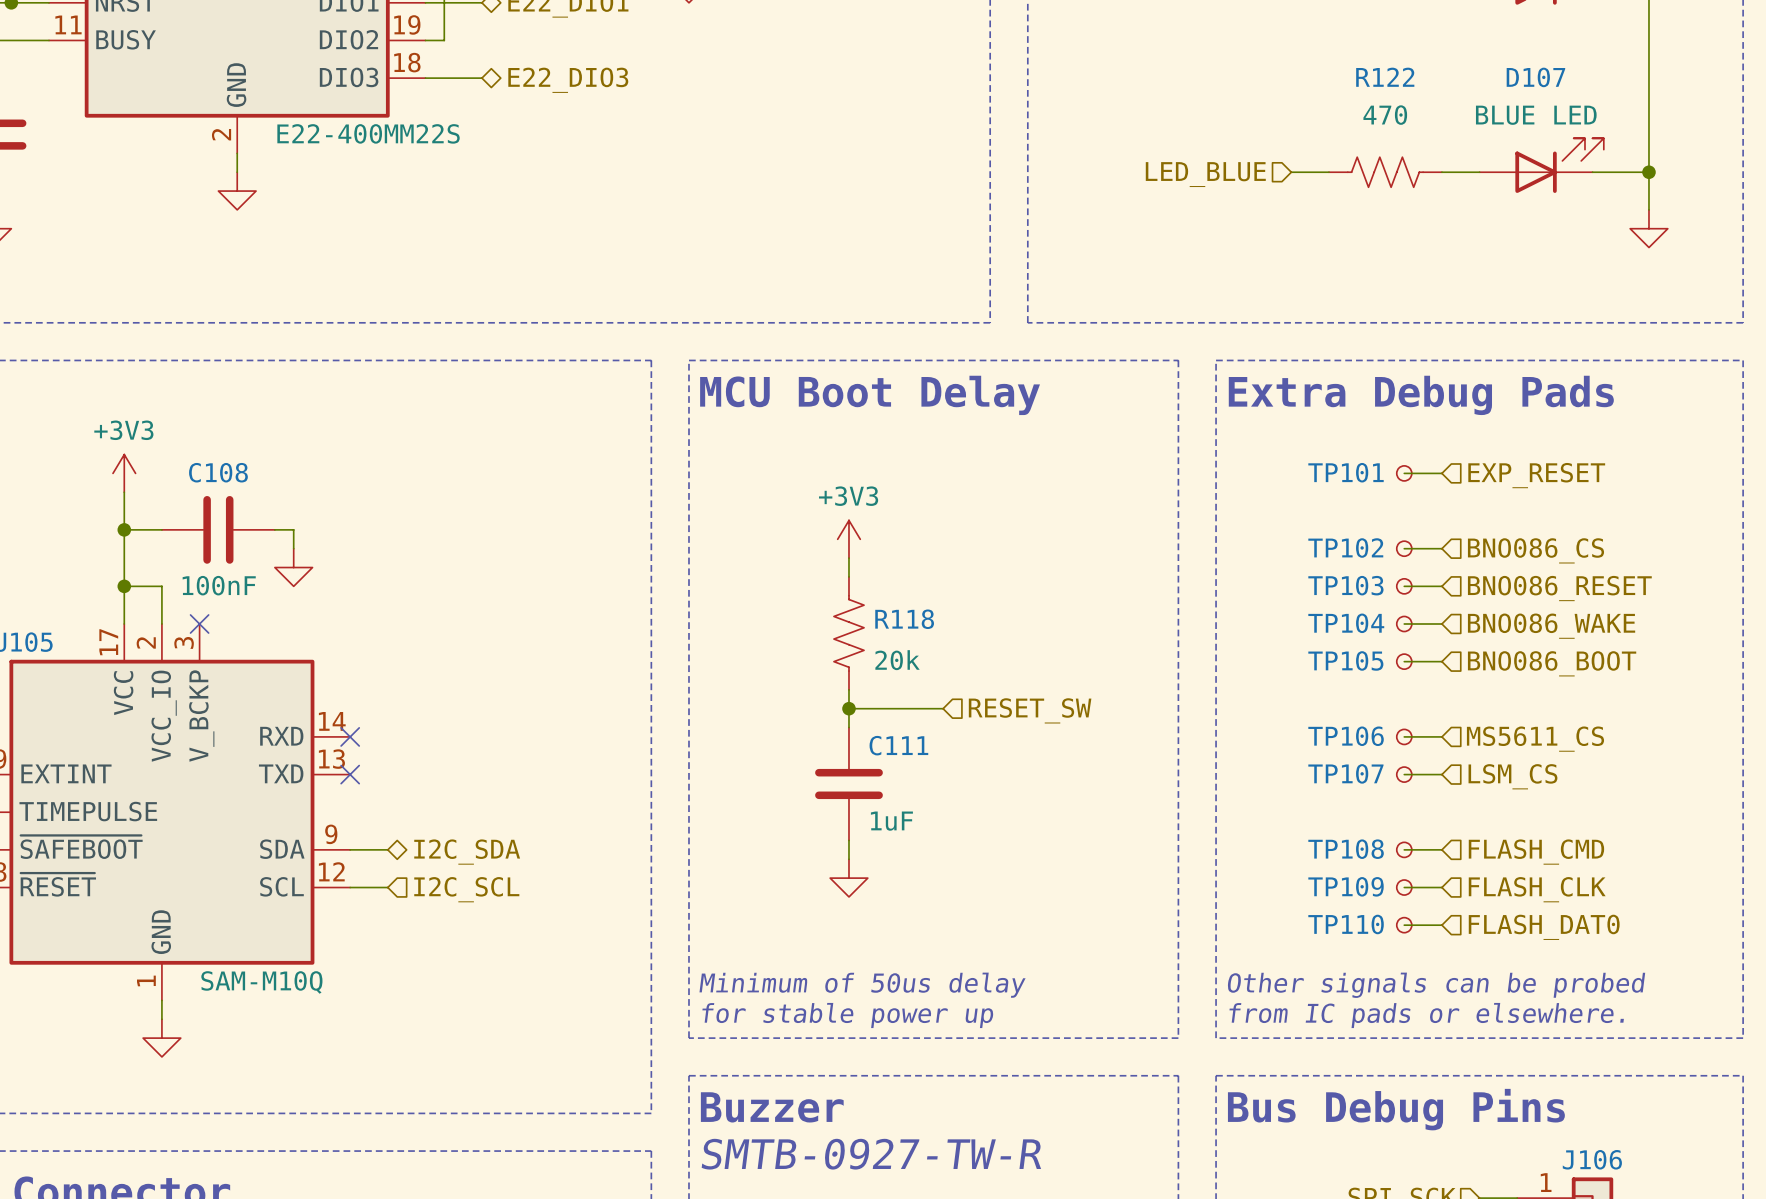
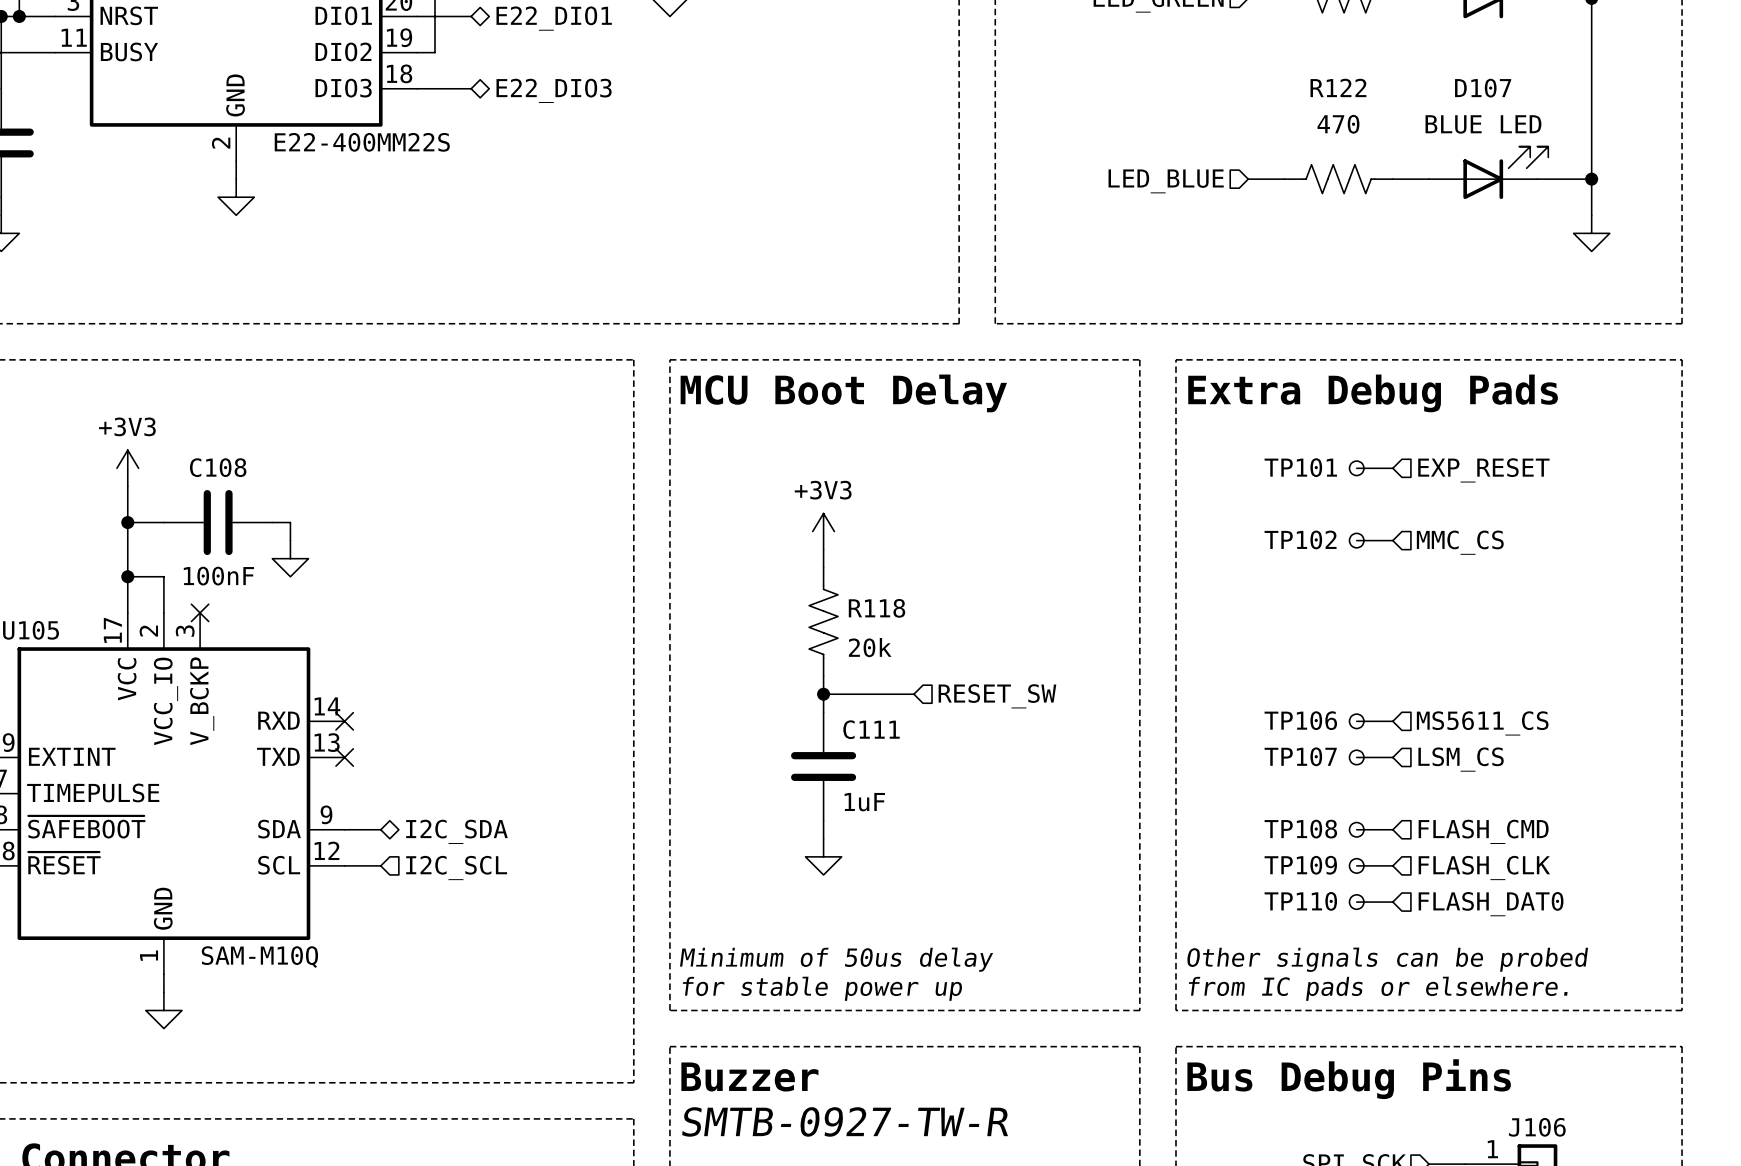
hierarchical label: BNO086_CS (1535, 550) -> MMC_CS (1460, 542)
wire: (1404, 586) (1441, 586) -> none
TP103: (1404, 586) -> none
hierarchical label: BNO086_RESET (1559, 588) -> none
wire: (1404, 623) (1441, 623) -> none
TP104: (1404, 623) -> none
hierarchical label: BNO086_WAKE (1551, 626) -> none
wire: (1404, 661) (1441, 661) -> none
TP105: (1404, 661) -> none
hierarchical label: BNO086_BOOT (1552, 663) -> none

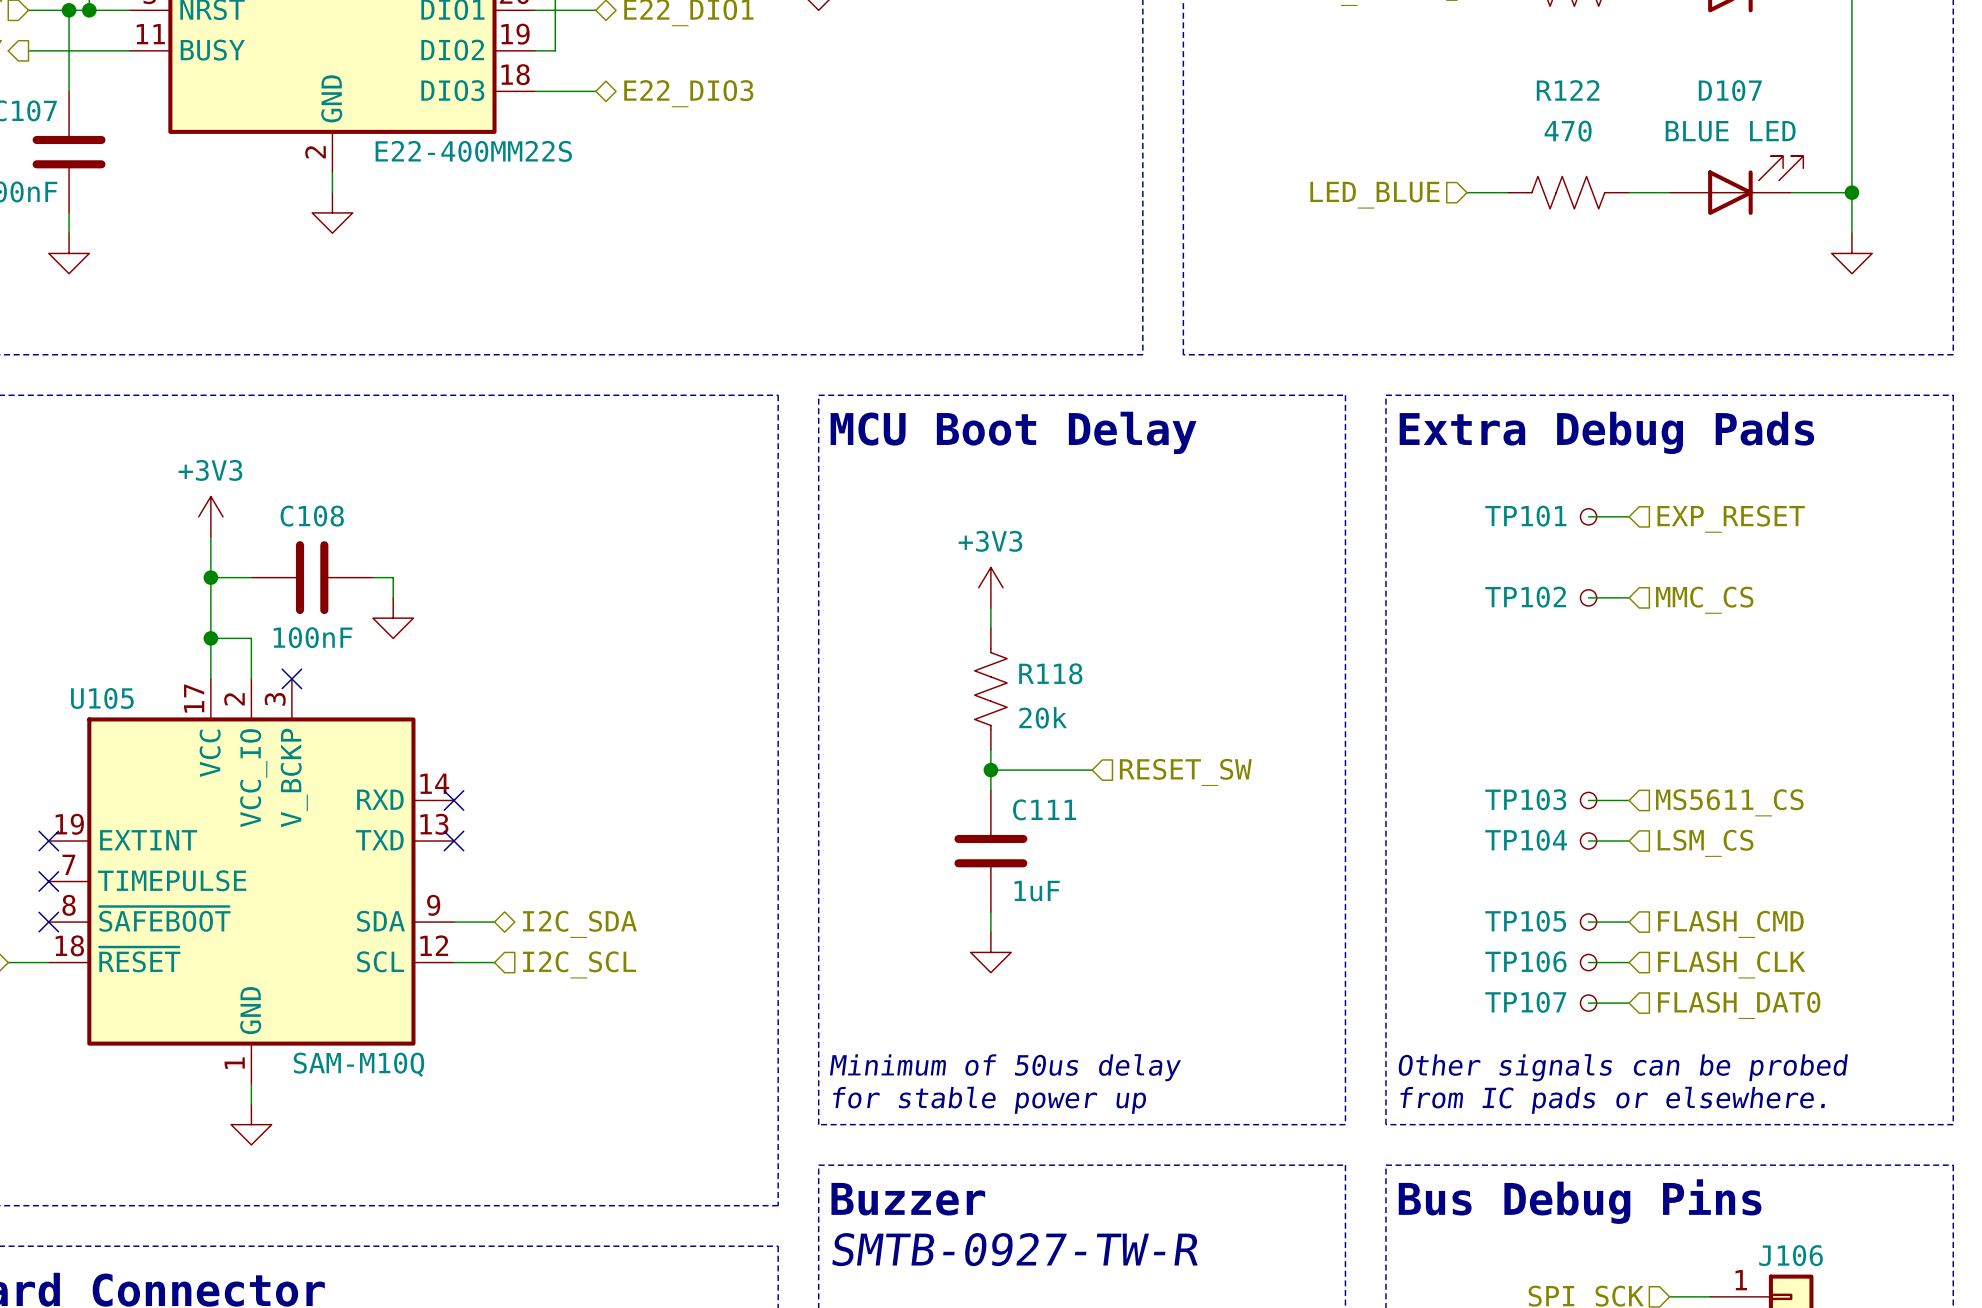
TP106 name: TP106 (1300, 720) -> TP103 (1525, 799)
TP107 name: TP107 (1300, 756) -> TP104 (1526, 840)
TP108 name: TP108 (1300, 829) -> TP105 (1525, 921)
TP109 name: TP109 (1300, 865) -> TP106 (1525, 961)
TP110 name: TP110 (1300, 901) -> TP107 (1525, 1002)

